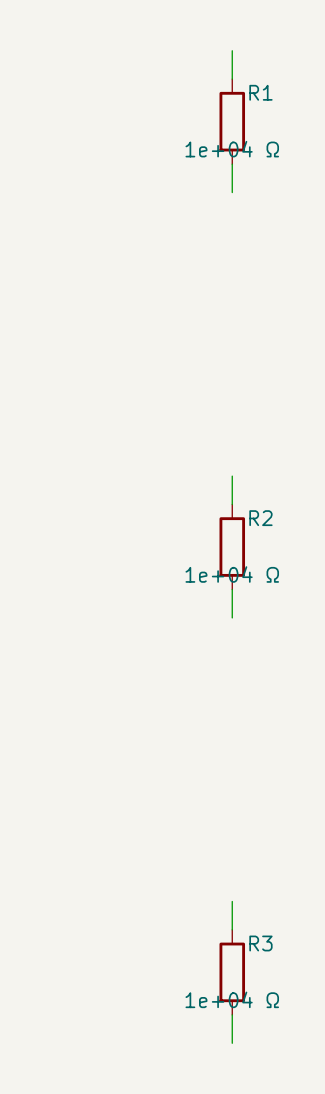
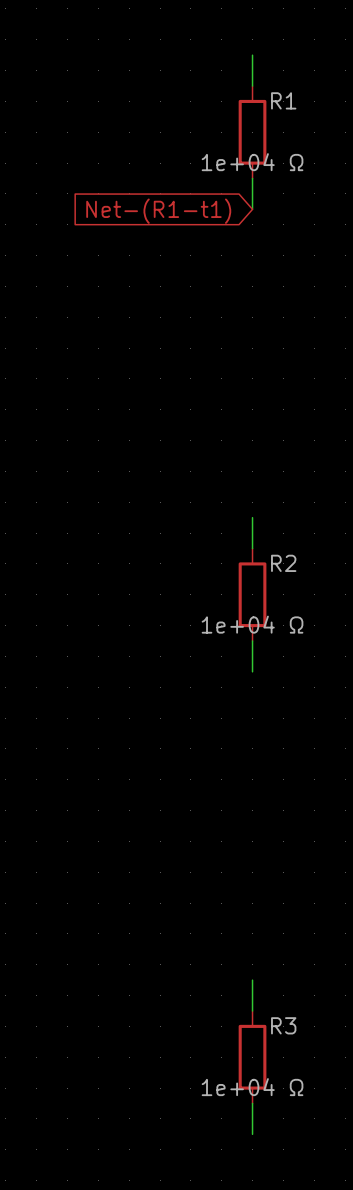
global label: none -> Net-(R1-t1) (158, 211)

